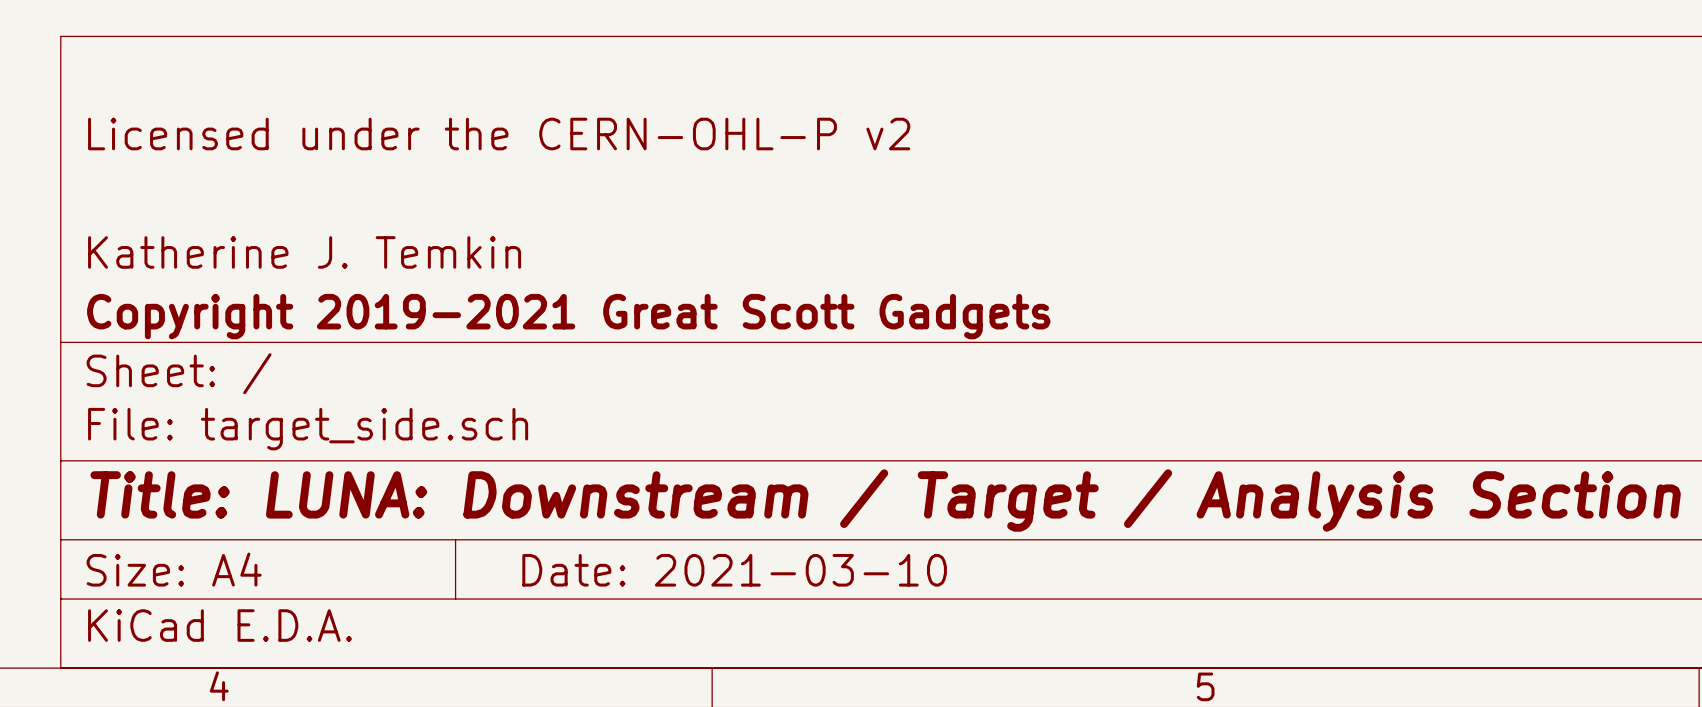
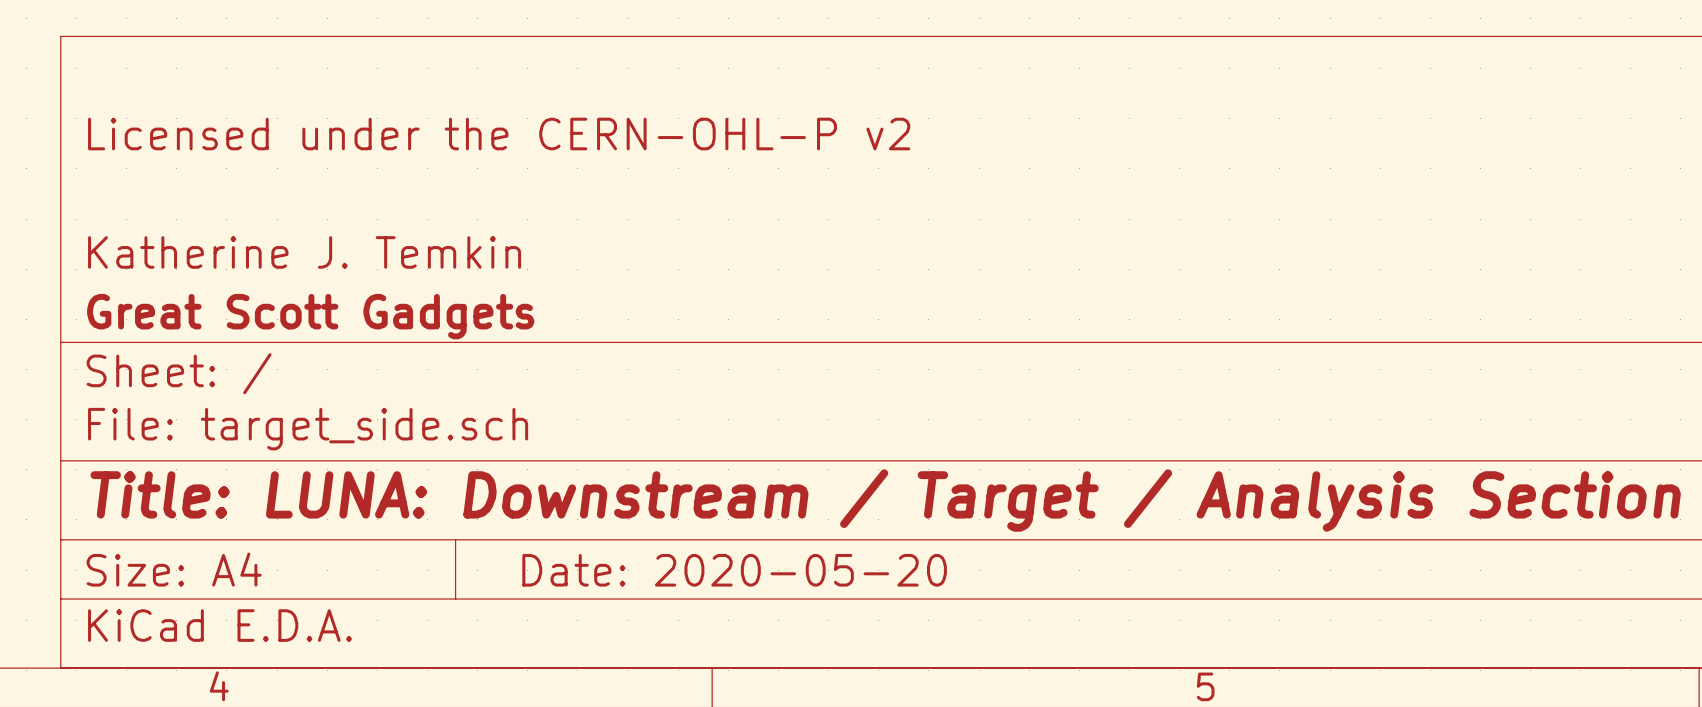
title block: Copyright 2019-2021 Great Scott Gadgets (568, 316) -> Great Scott Gadgets (310, 316)
title block: Date: 2021-03-10 (734, 570) -> Date: 2020-05-20 (734, 570)

